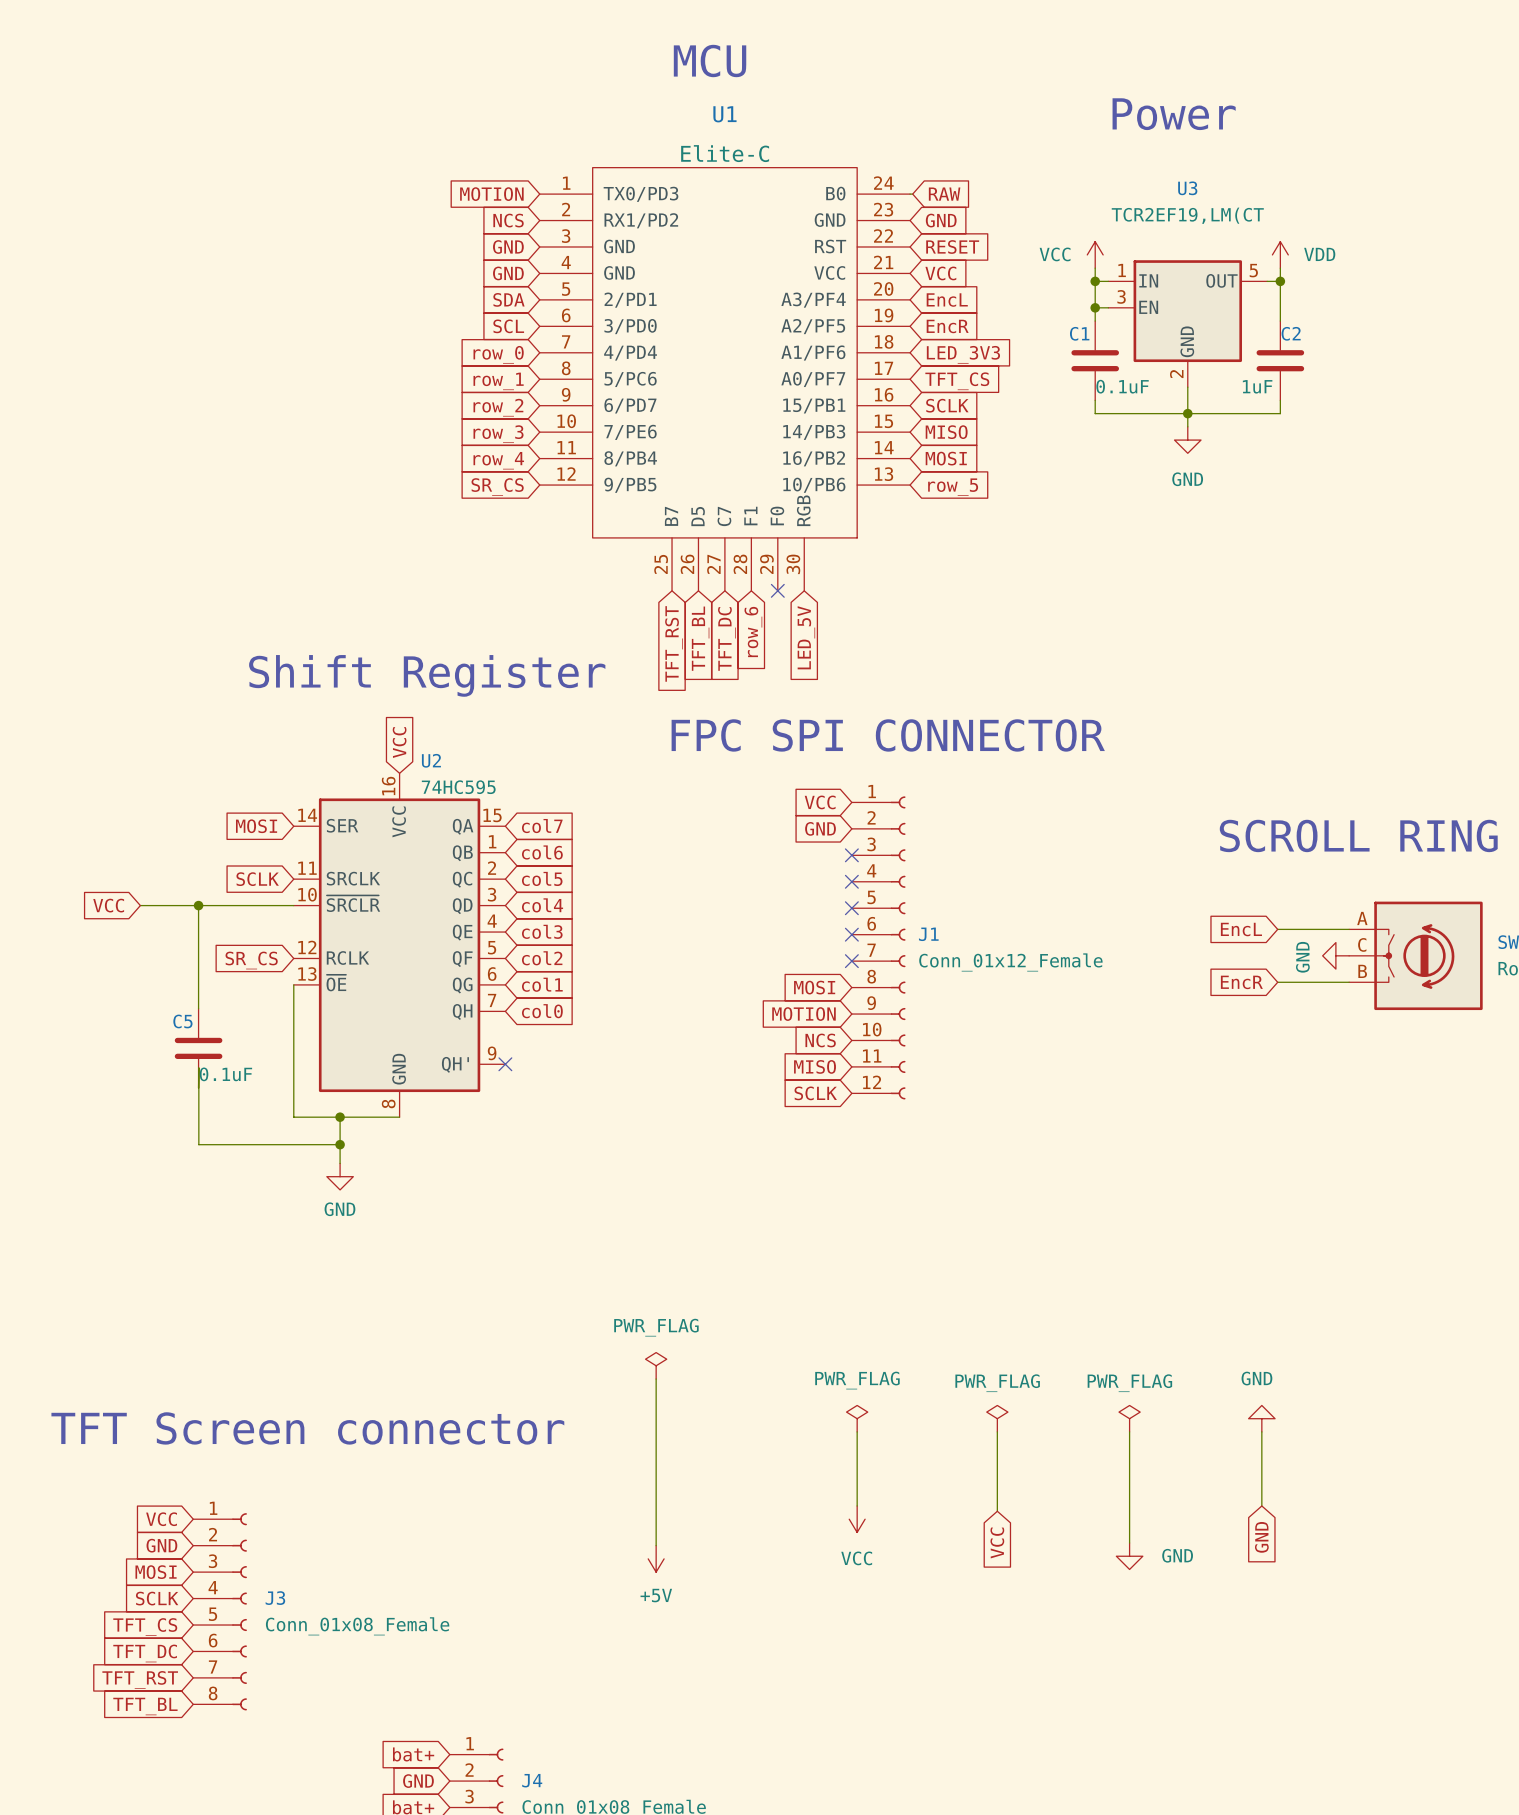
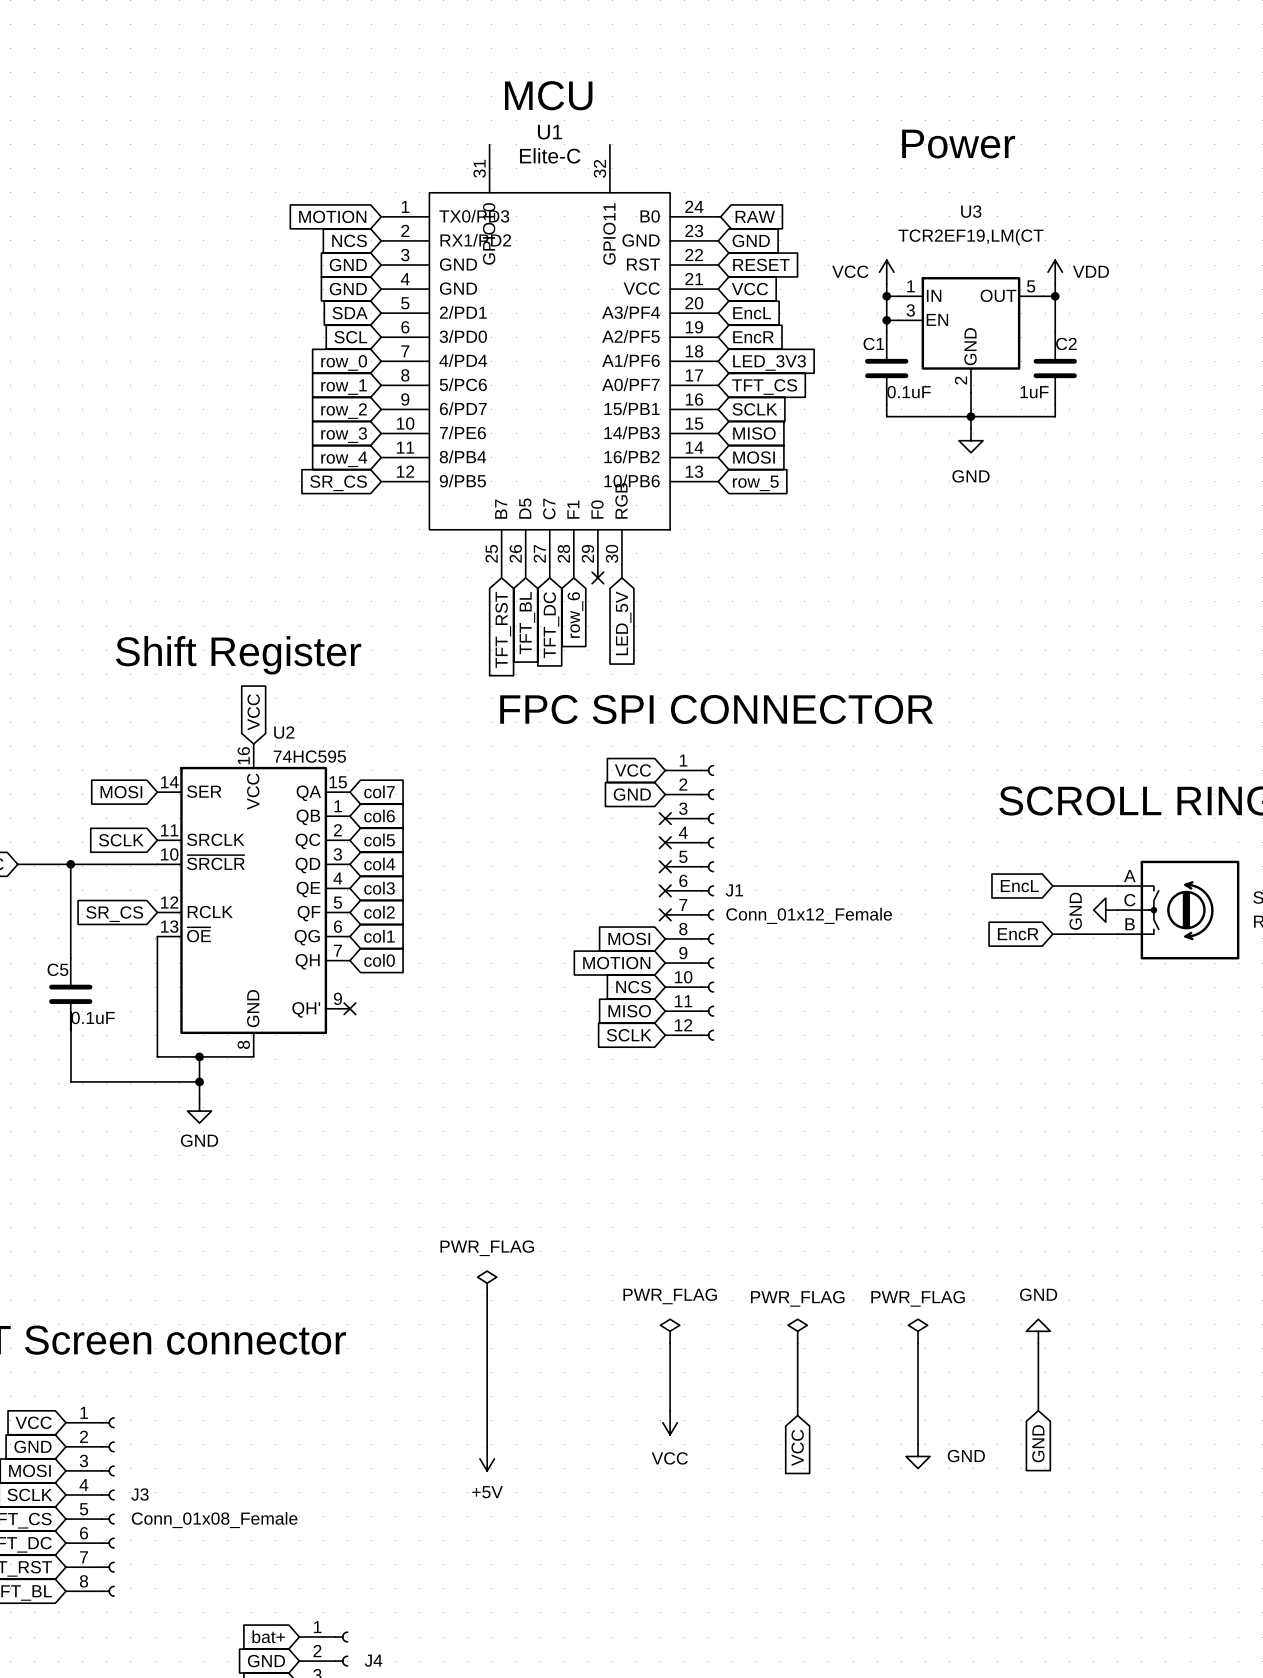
U1 symbol: [539, 167, 911, 591] -> [381, 144, 719, 578]

